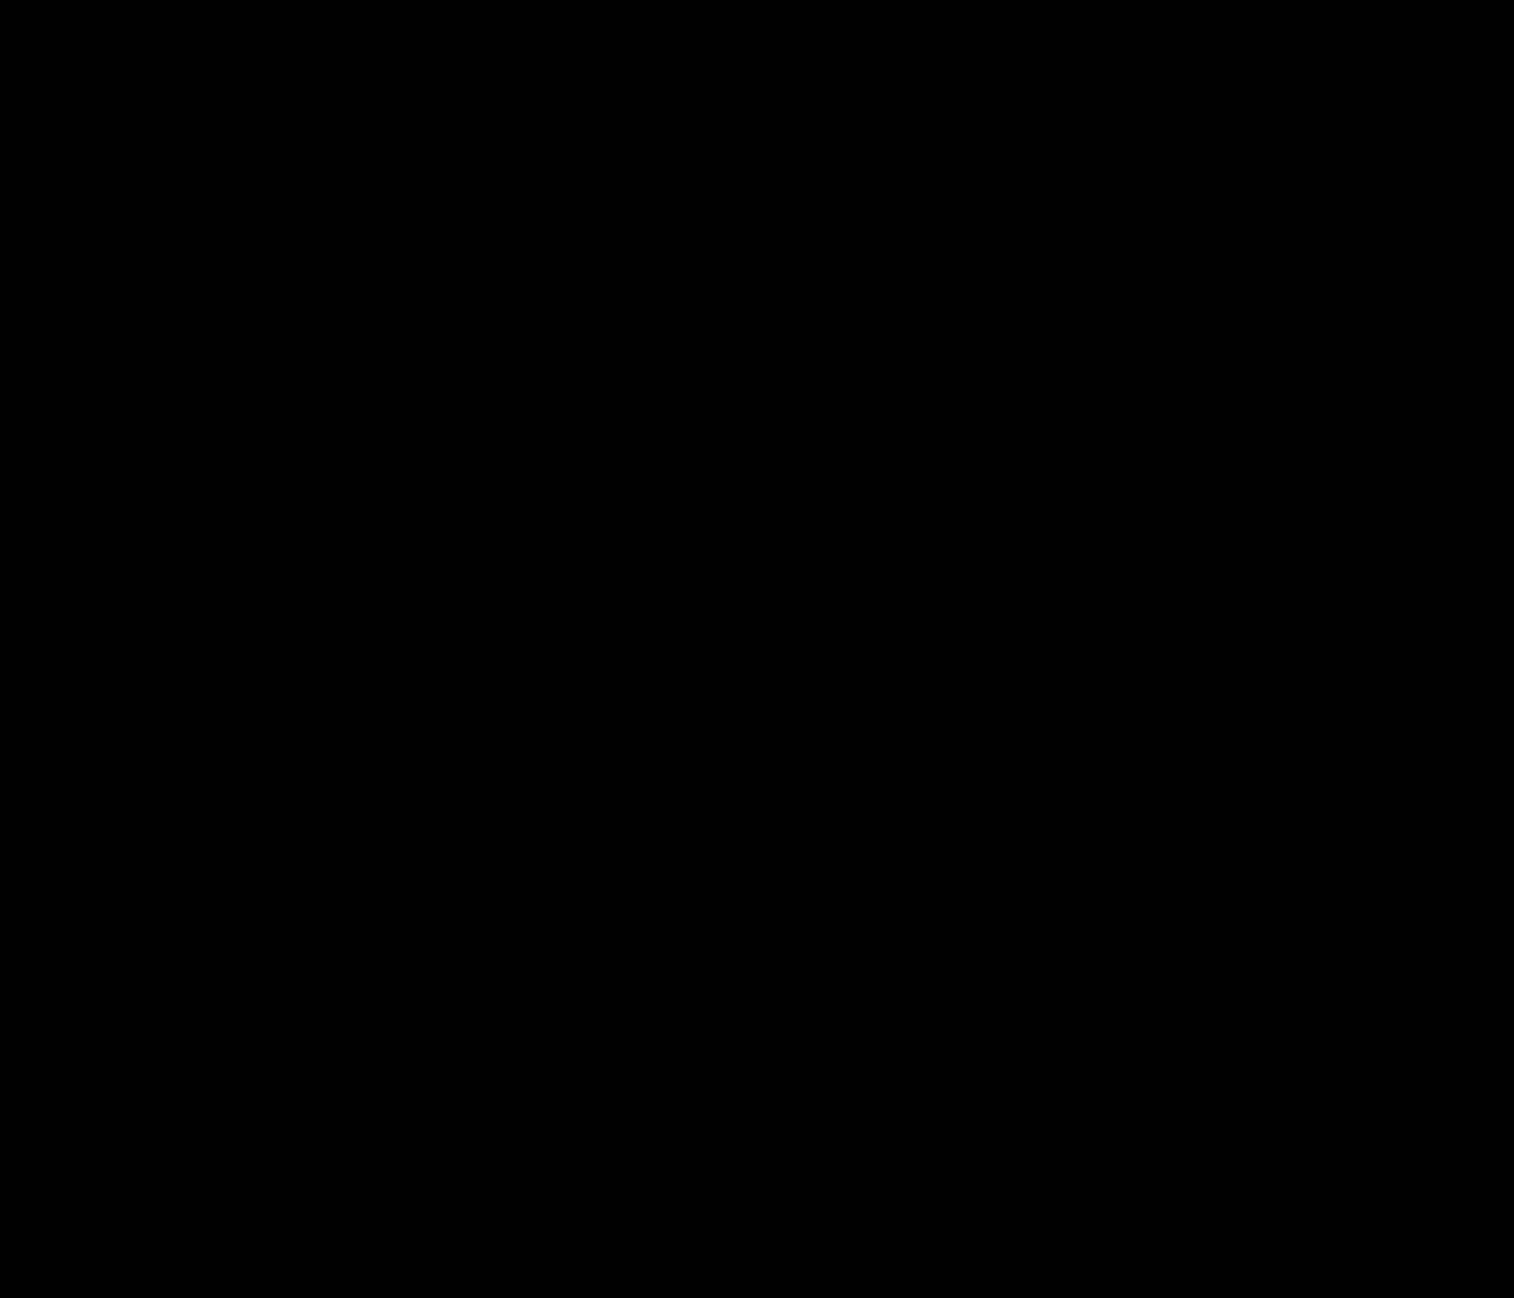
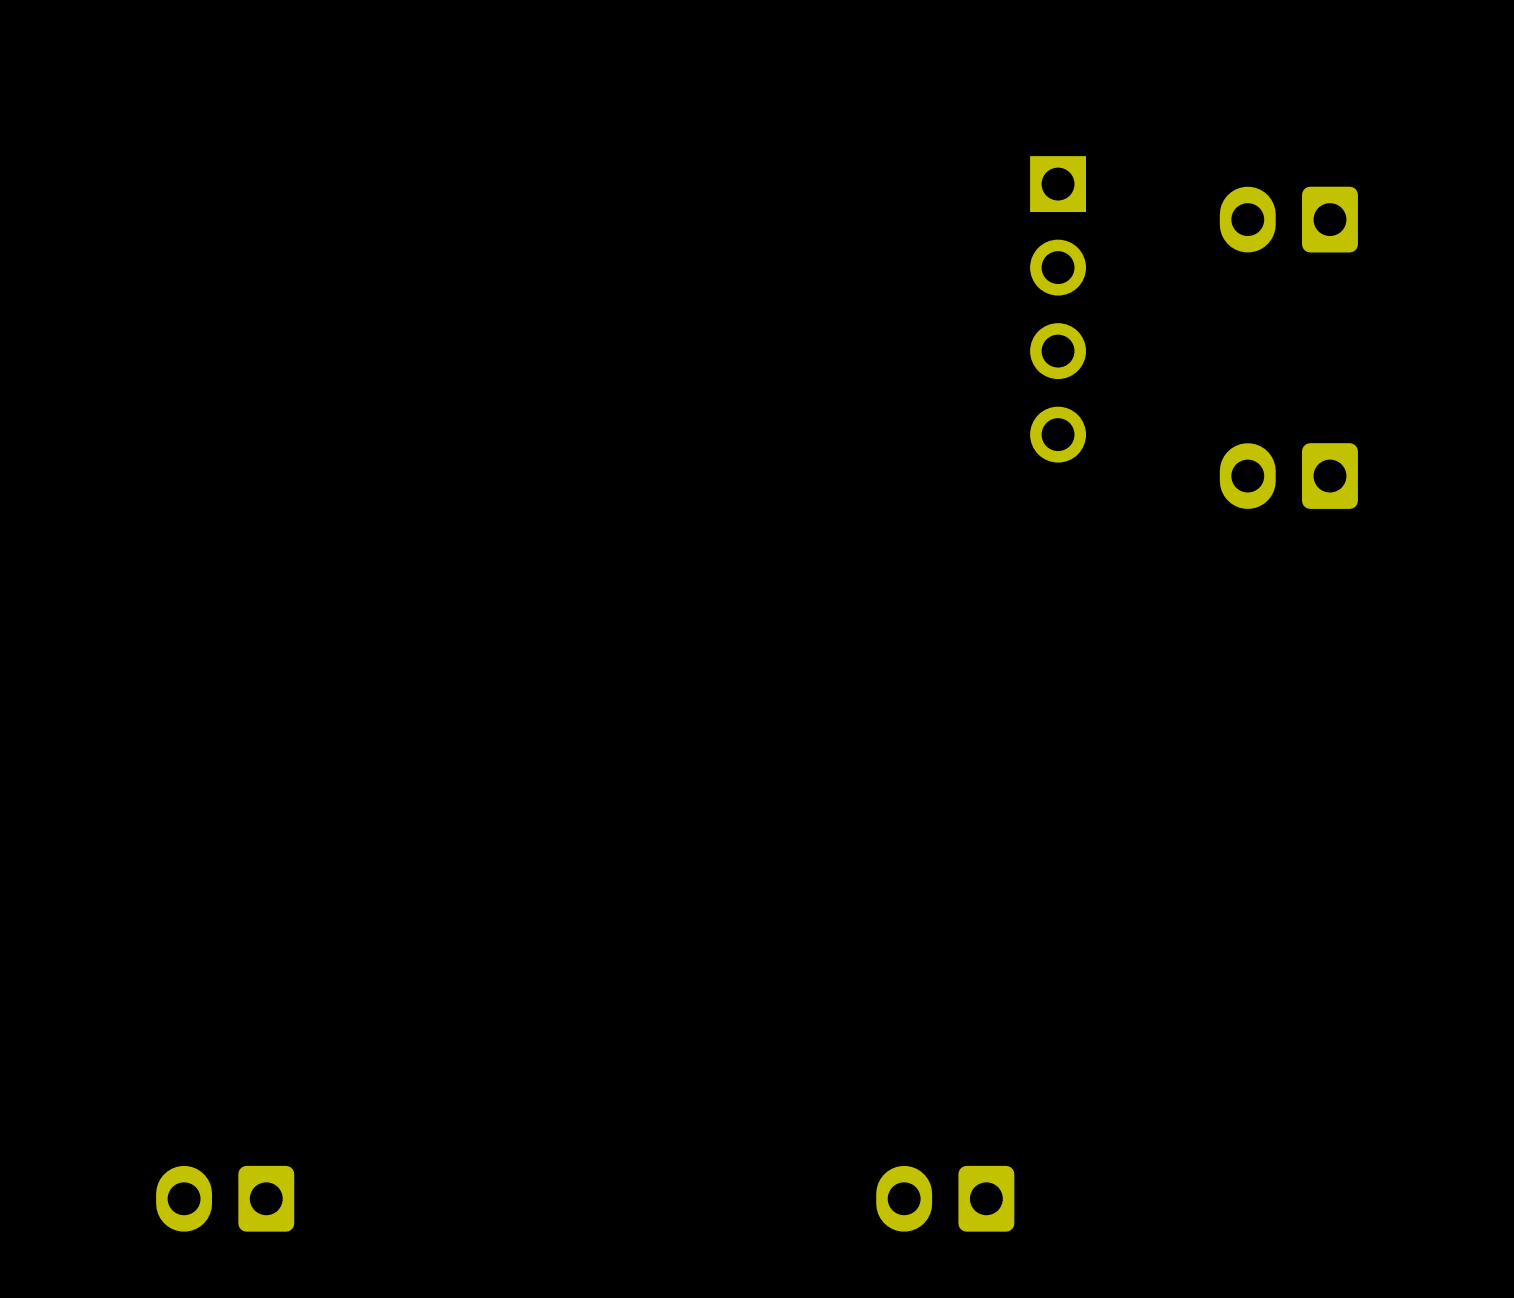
part: none -> (1288, 219)
part: none -> (1058, 309)
part: none -> (1288, 476)
part: none -> (225, 1198)
part: none -> (945, 1198)

